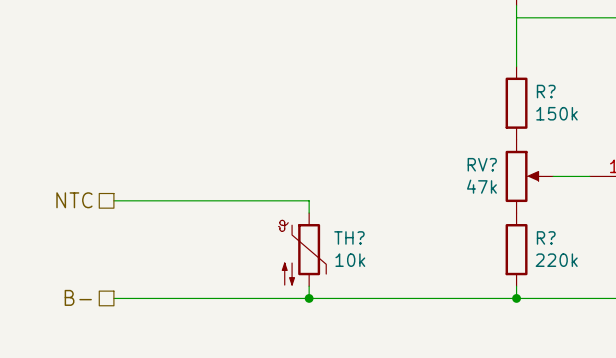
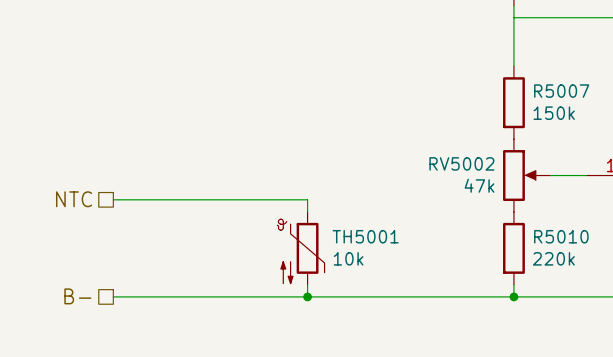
R? name: R? (546, 91) -> R5007 (561, 91)
RV? name: RV? (482, 164) -> RV5002 (461, 163)
TH? name: TH? (349, 237) -> TH5001 (365, 236)
R? name: R? (546, 237) -> R5010 (561, 236)

